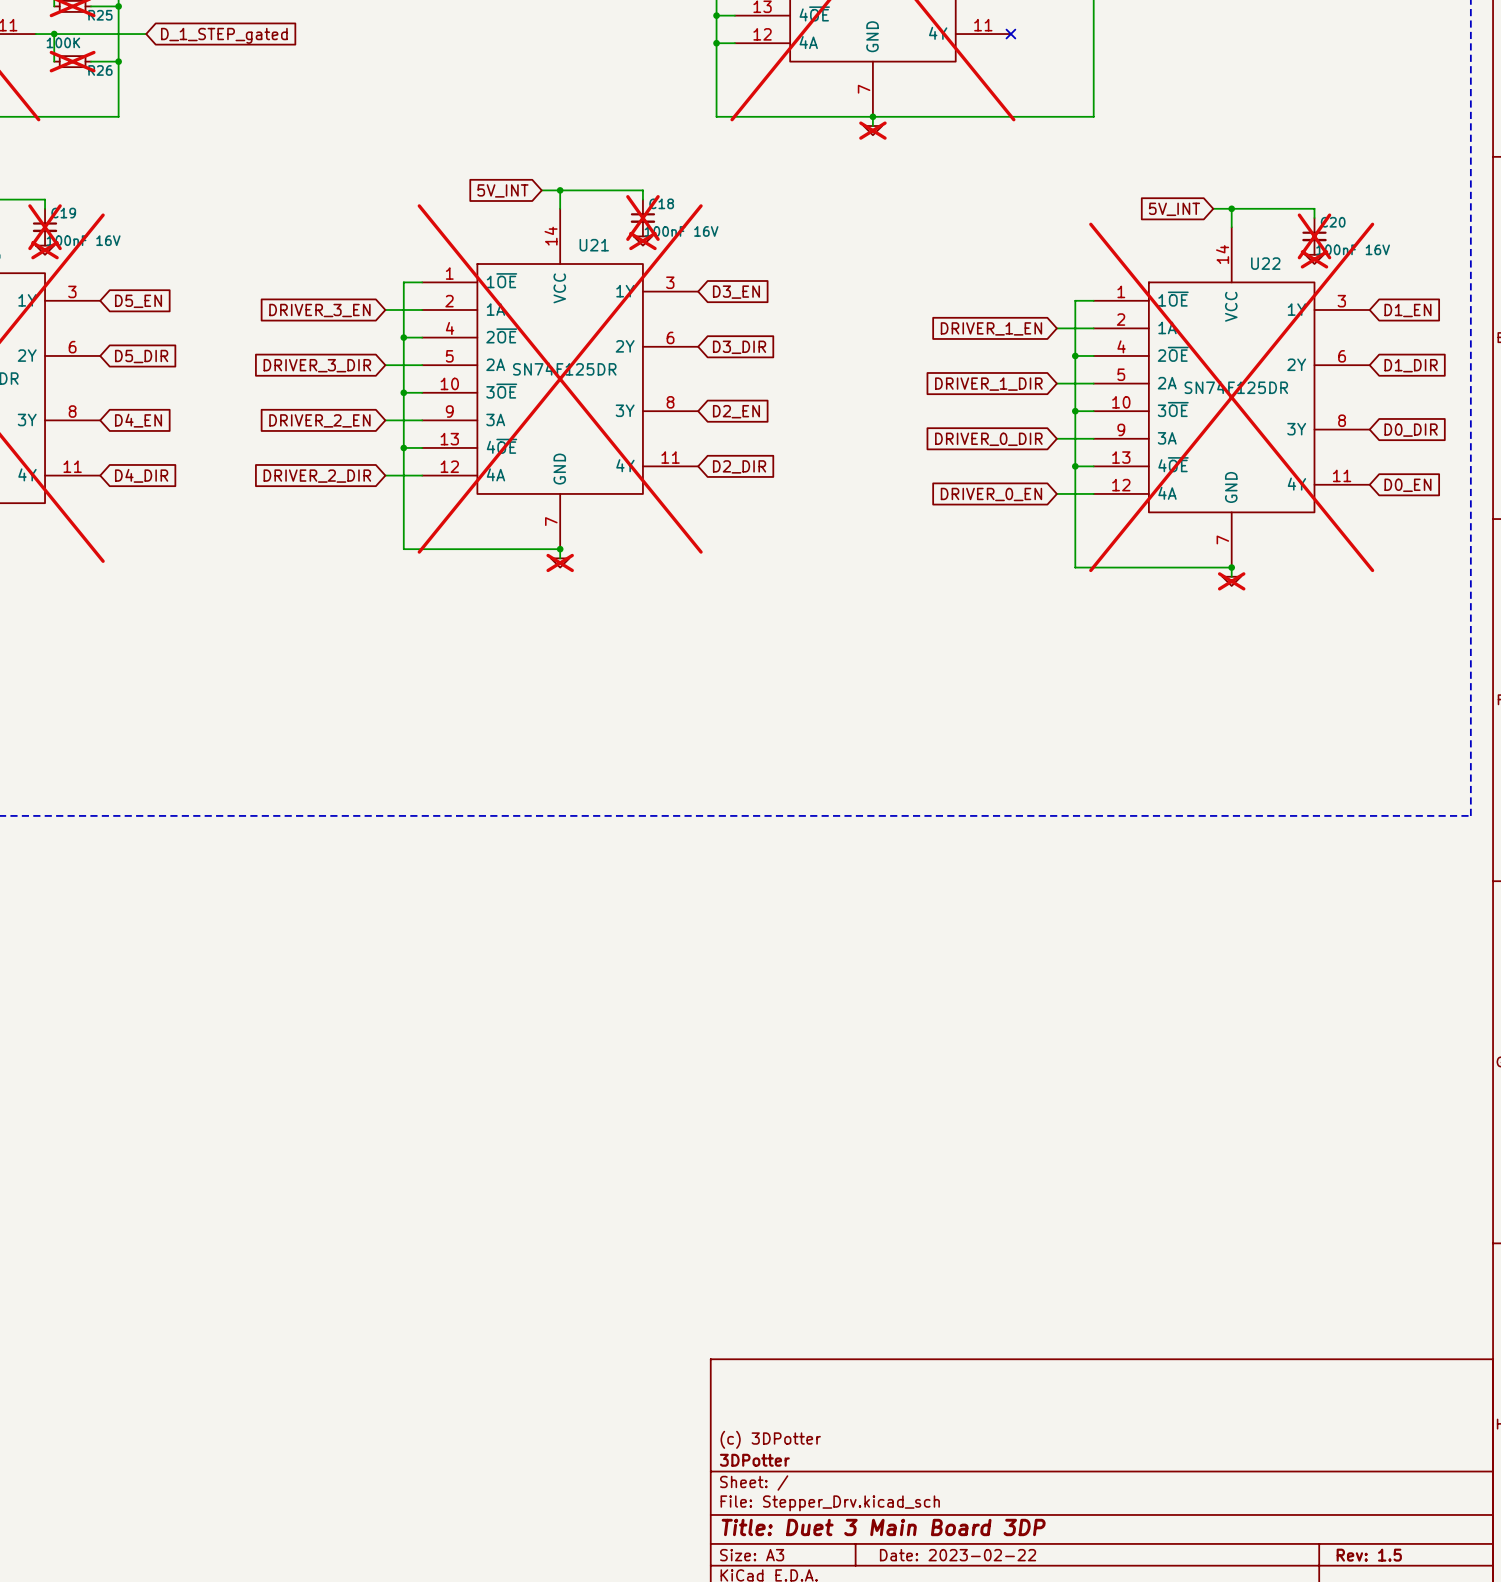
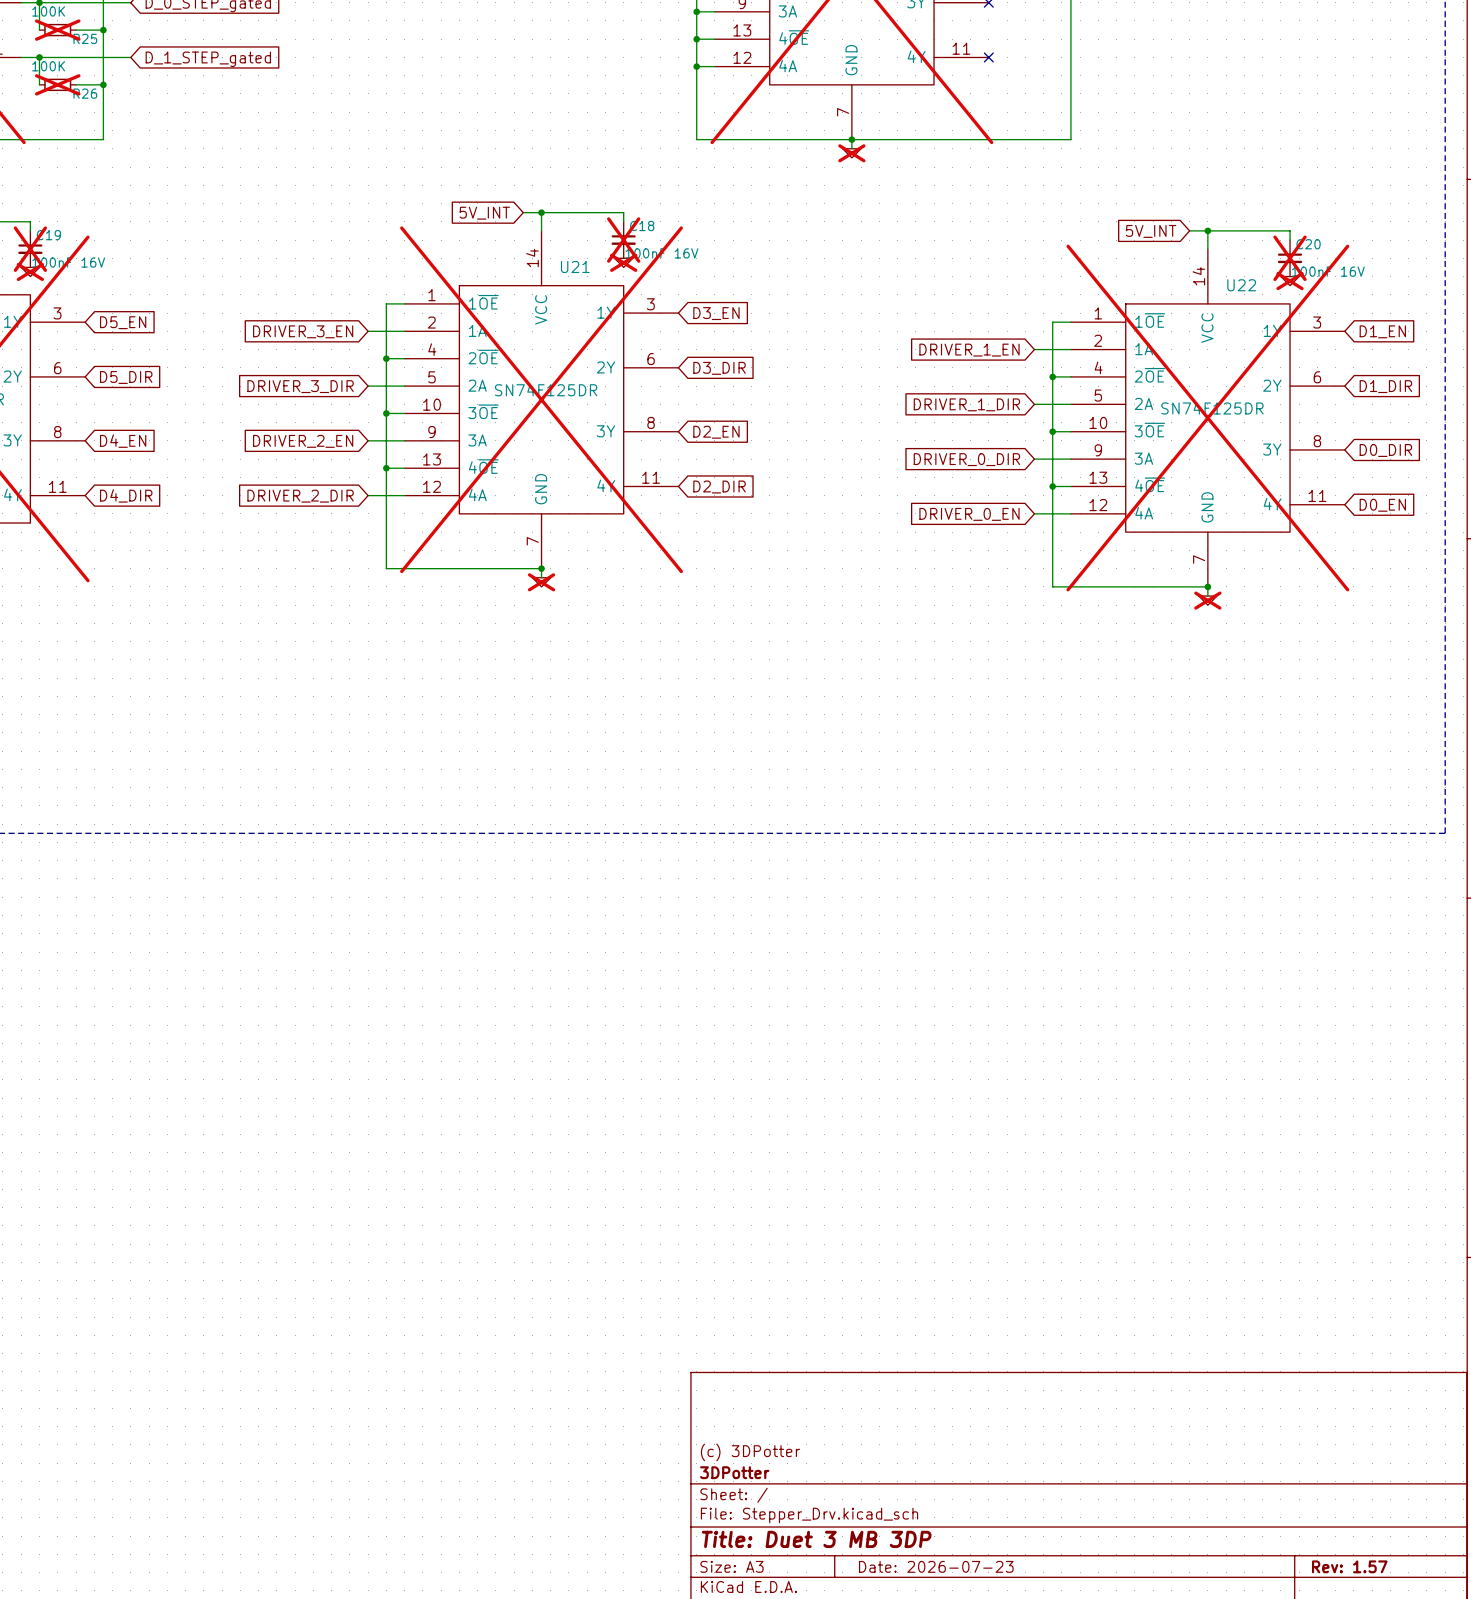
title block: Title: Duet 3 Main Board 3DP (883, 1527) -> Title: Duet 3 MB 3DP (816, 1539)
title block: Date: 2023-02-22 (958, 1555) -> Date: 2026-07-23 (936, 1566)
title block: Rev: 1.5 (1369, 1555) -> Rev: 1.57 (1349, 1566)

